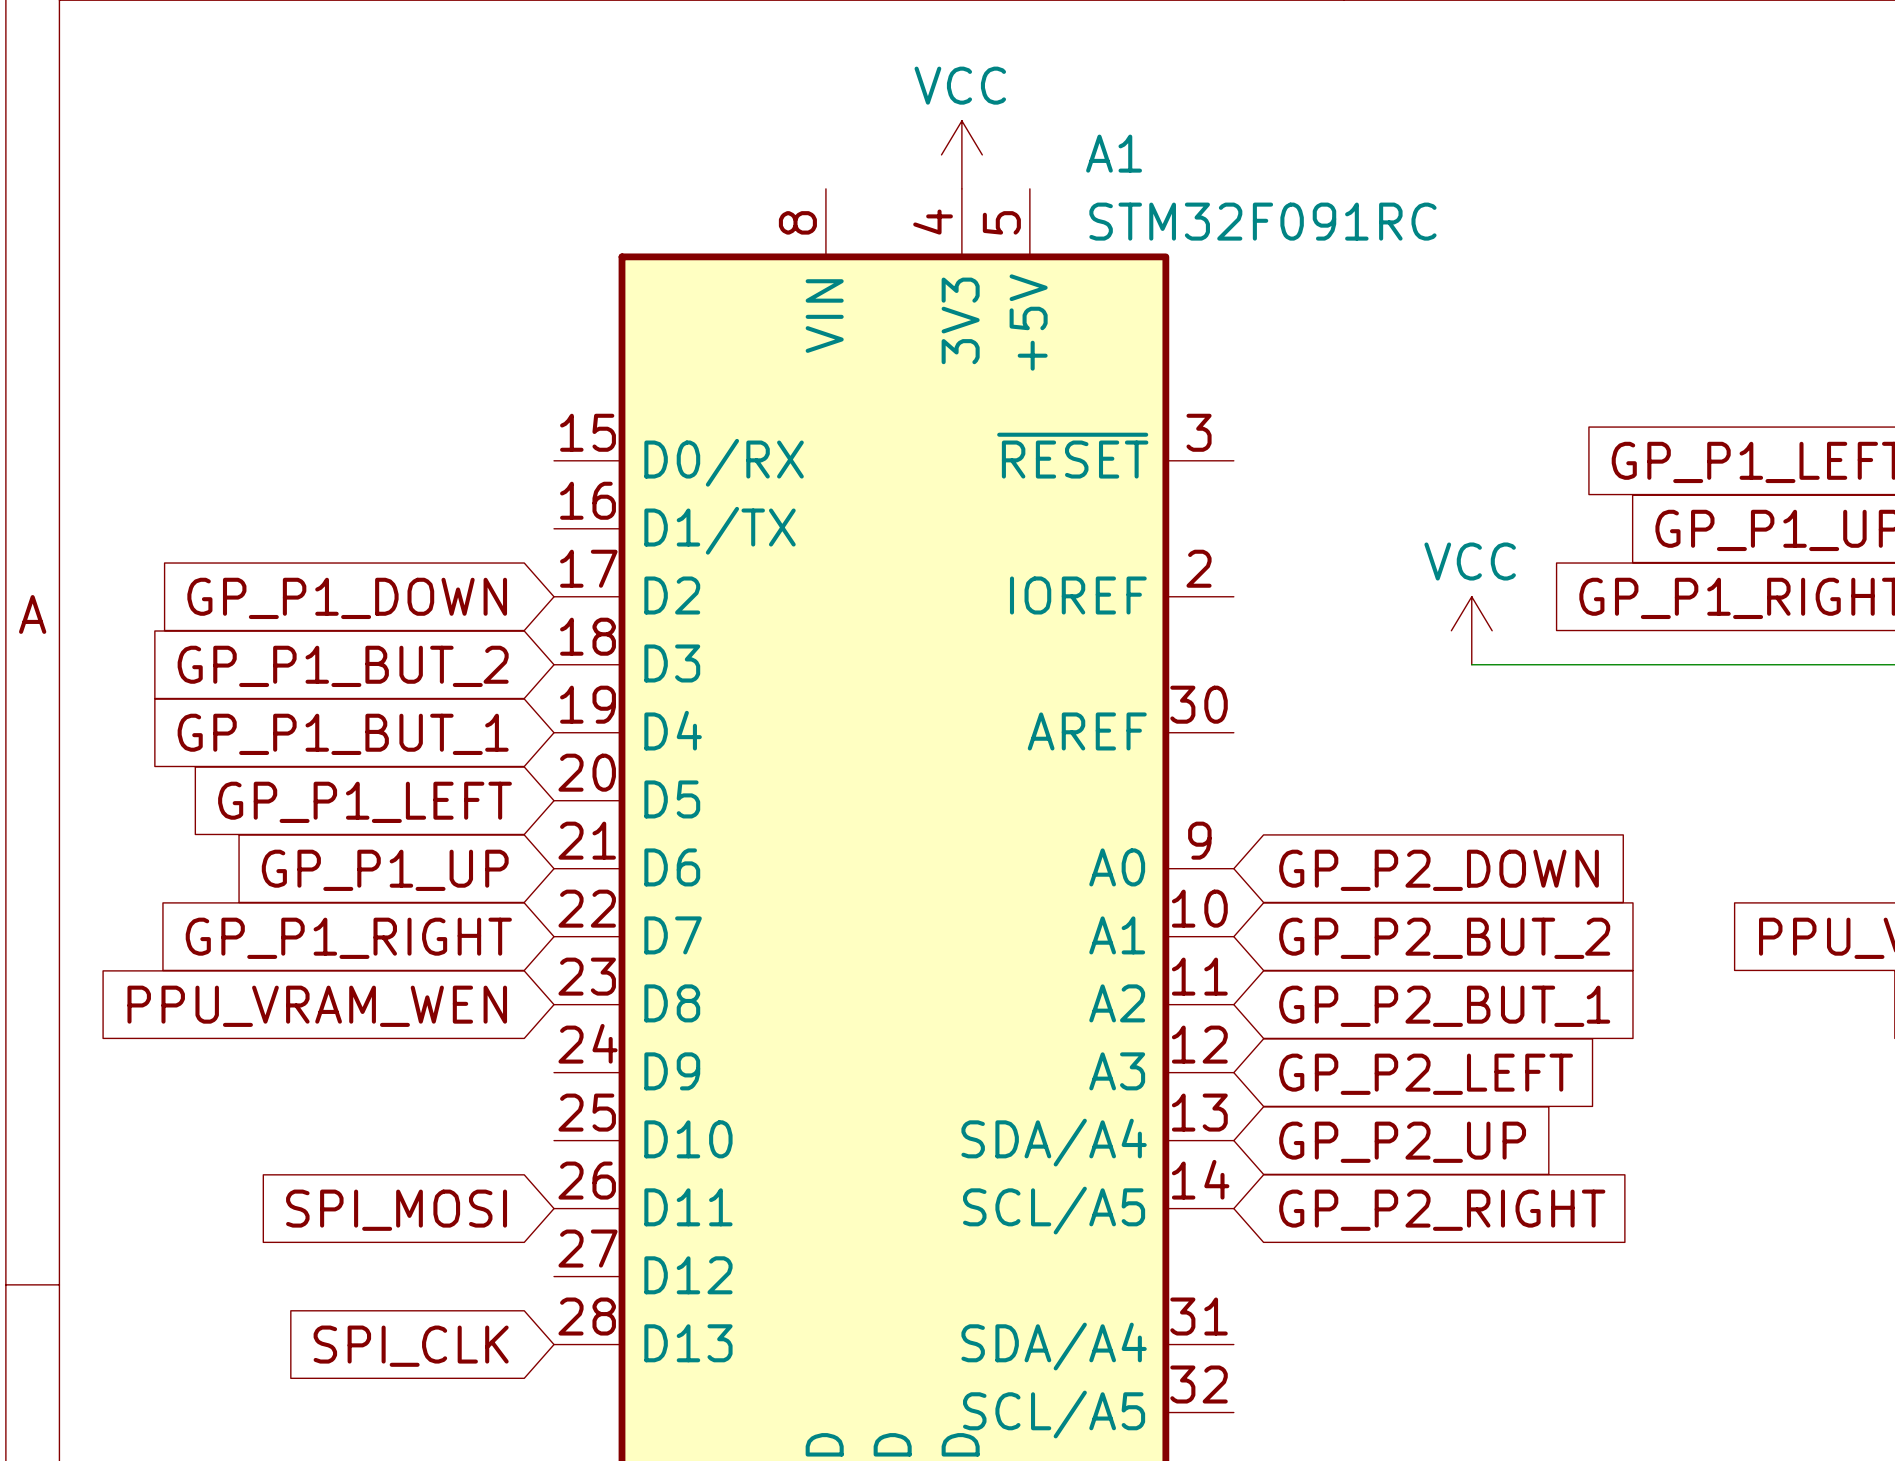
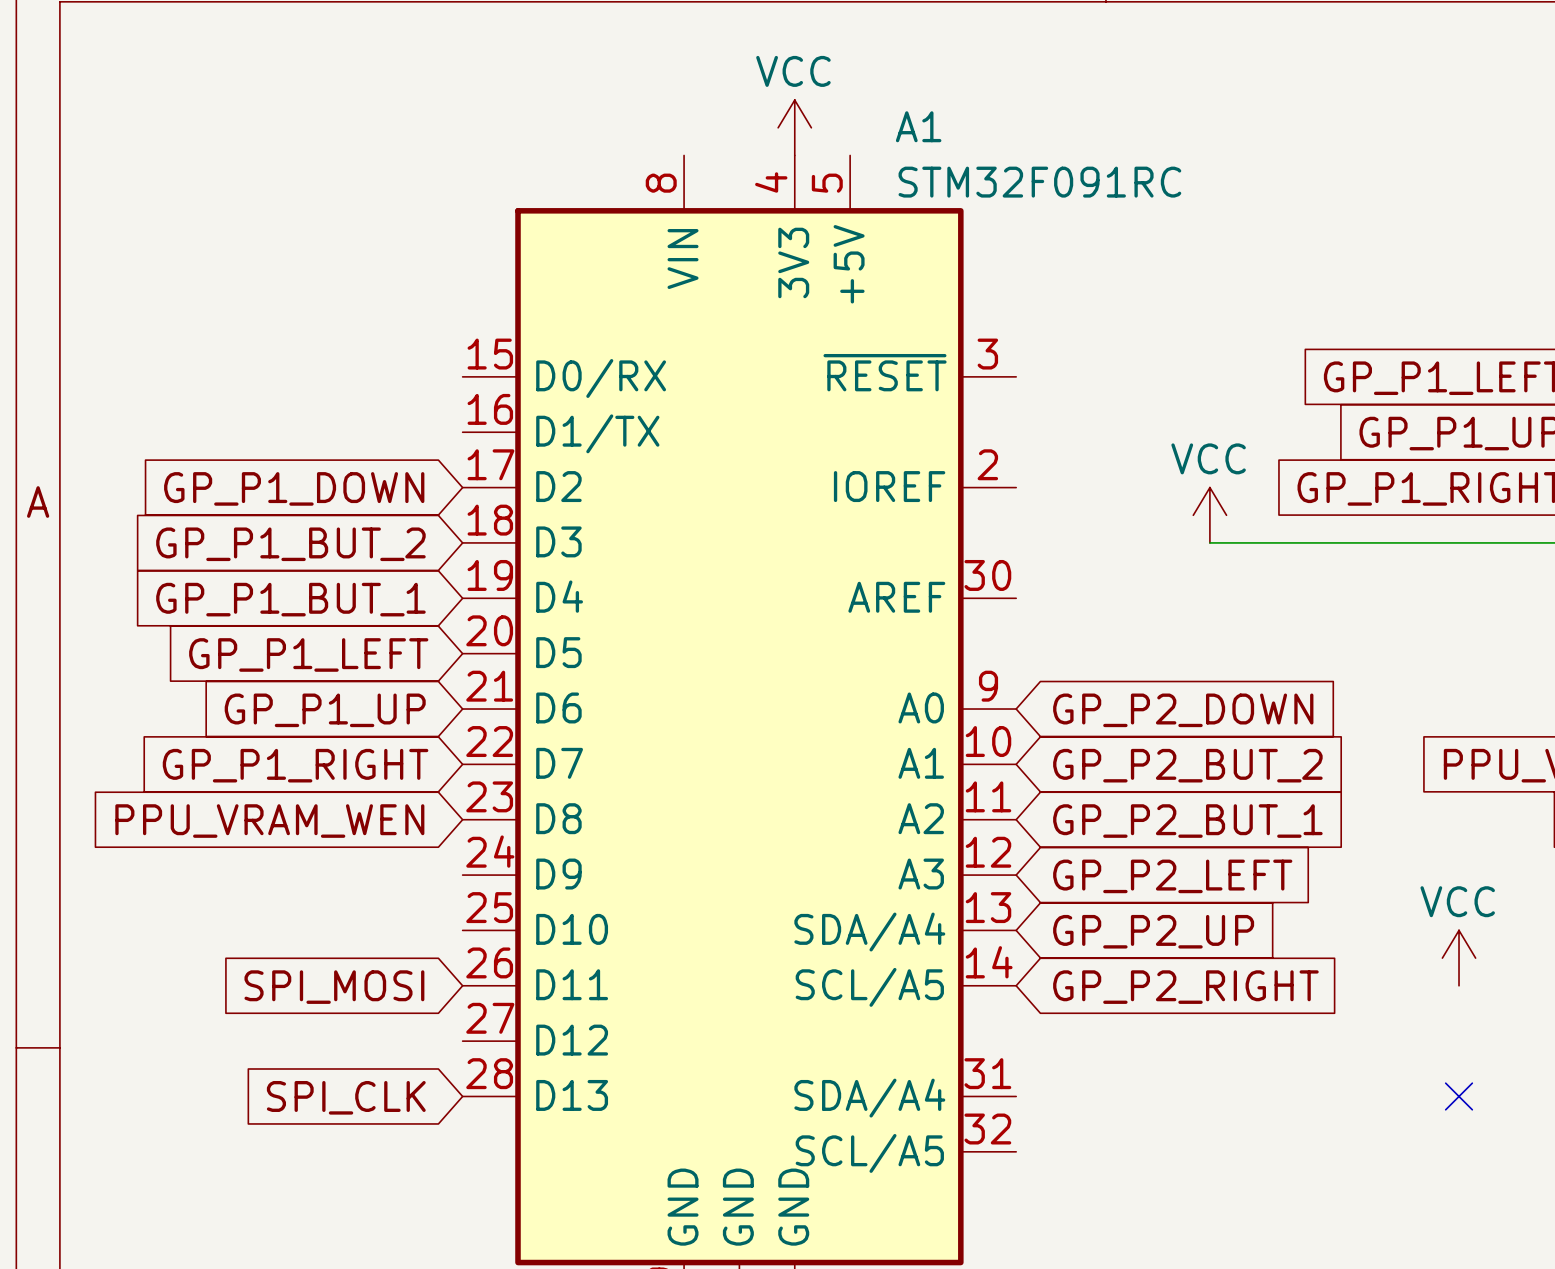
power symbol: none -> VCC (1459, 958)
no-connect mark: none -> (1459, 1096)

